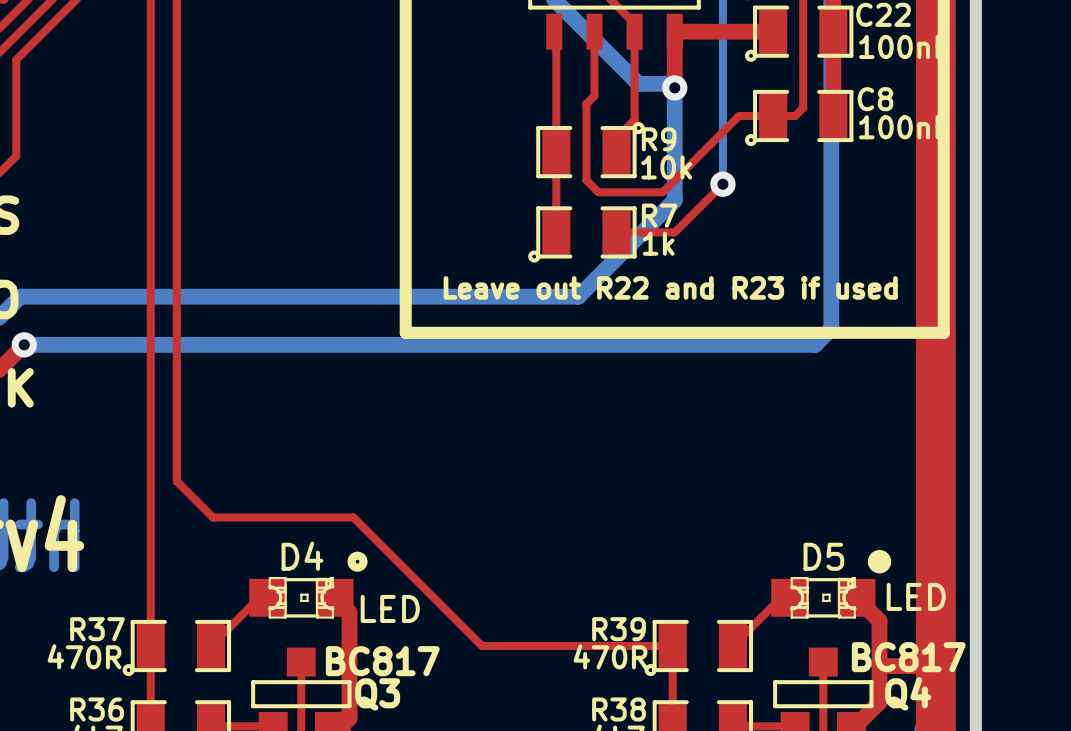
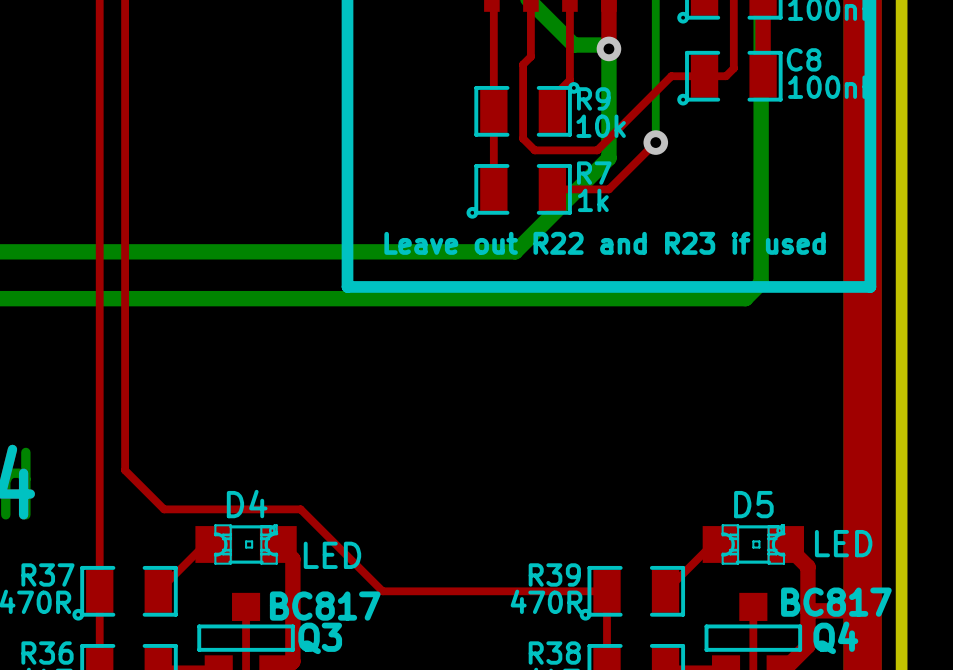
top track: (176, 481) (212, 517) (353, 517) (482, 646) -> (125, 431) (125, 470) (164, 509) (300, 509) (382, 591) (421, 591)
drawing: [867, 549, 892, 574] -> none
drawing: [347, 551, 368, 572] -> none

